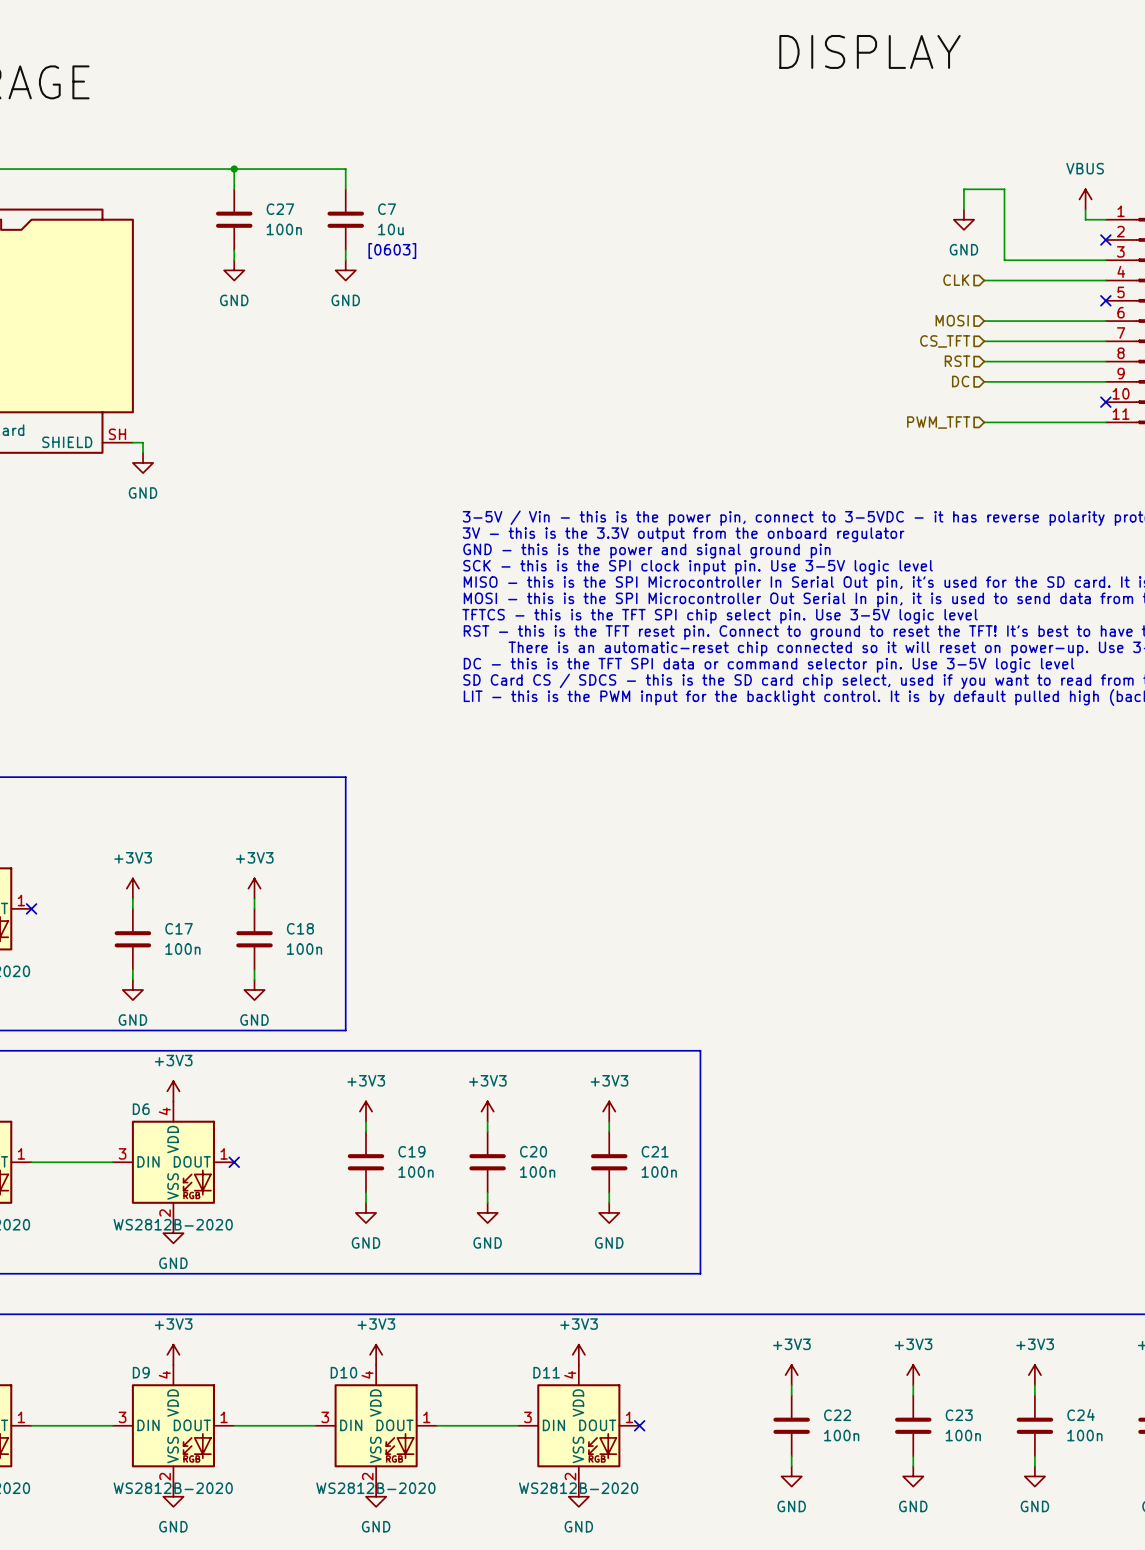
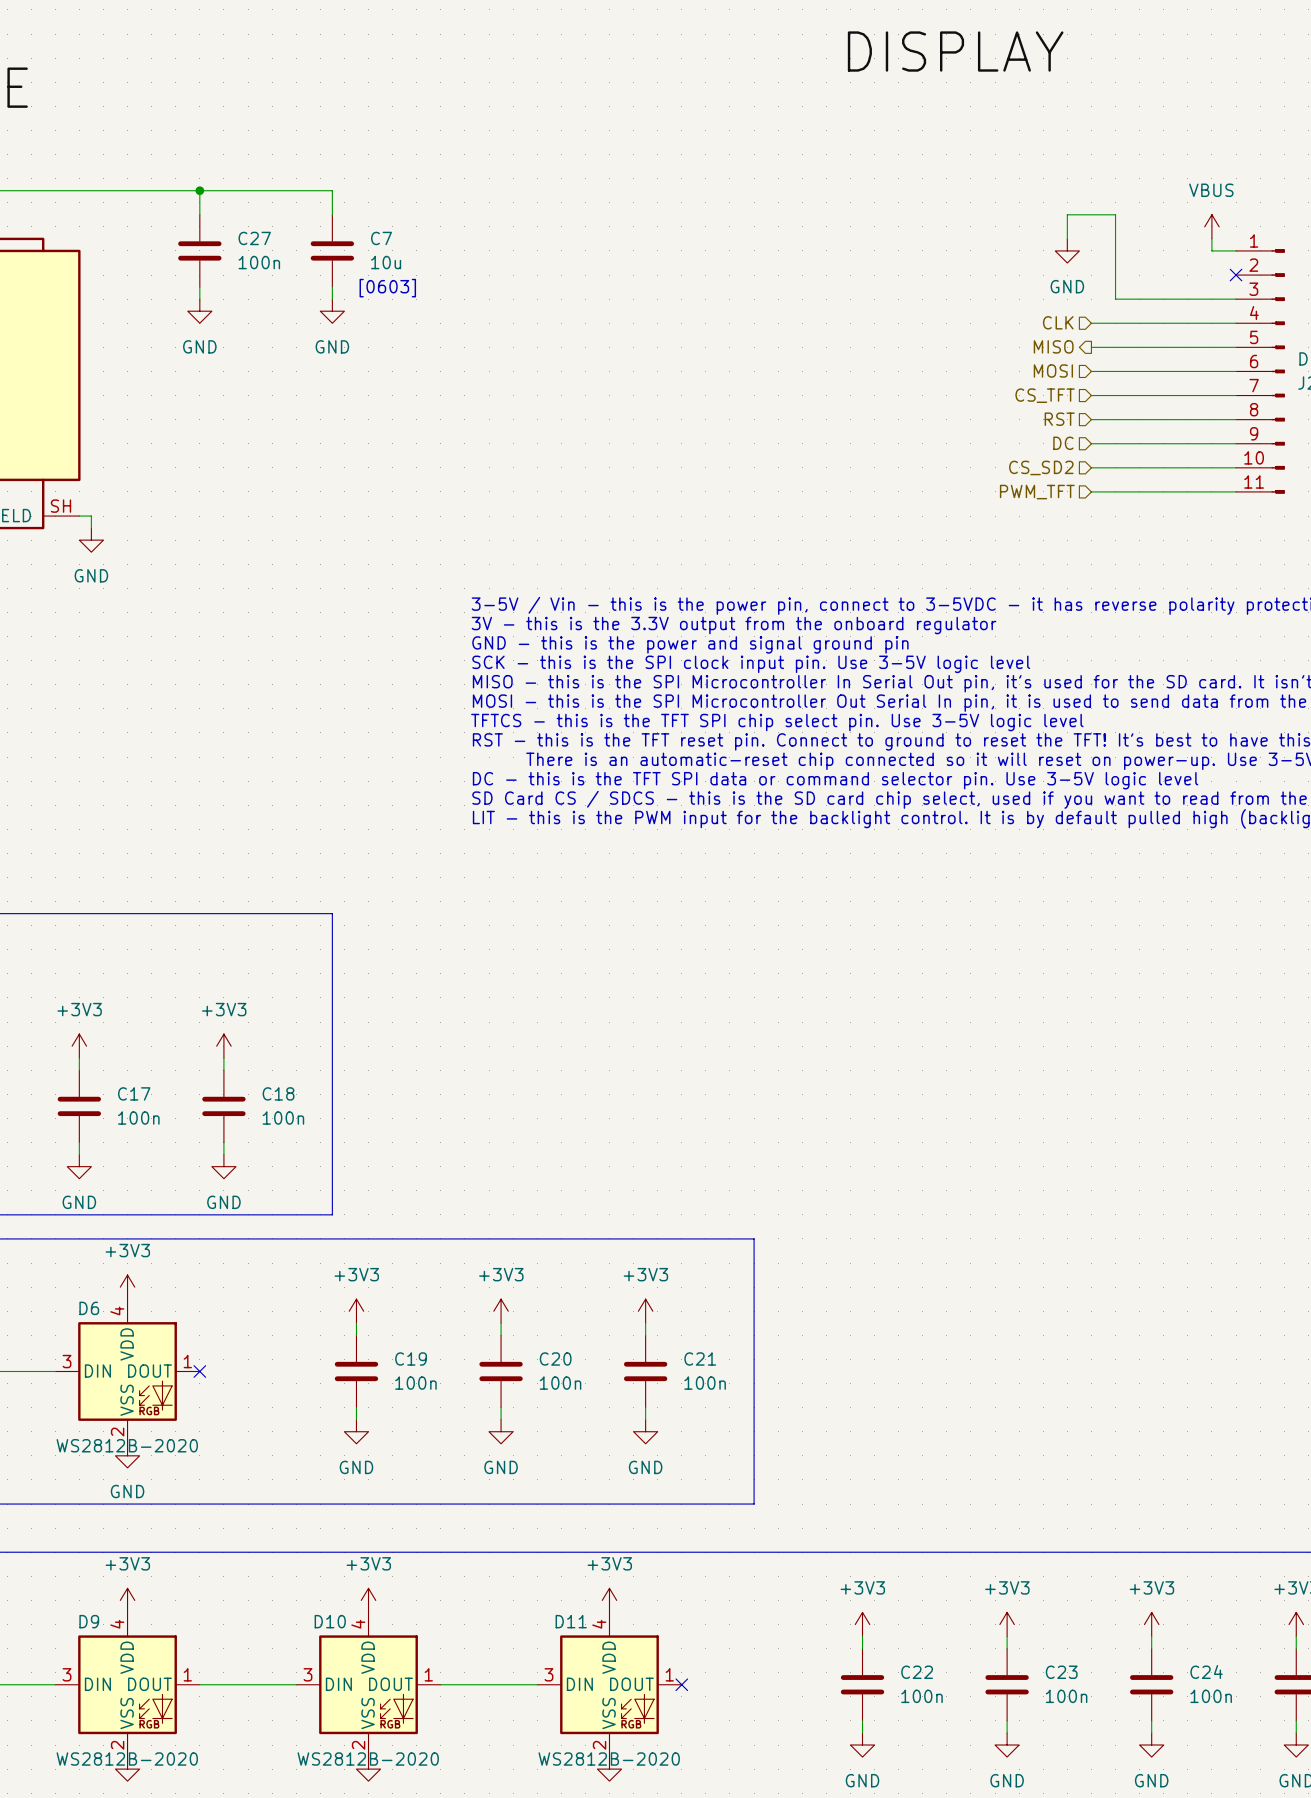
hierarchical label: none -> MISO (1053, 346)
wire: none -> (1091, 347) (1236, 347)
no-connect mark: (1105, 300) -> none
hierarchical label: none -> CS_SD2 (1041, 467)
wire: none -> (1091, 467) (1236, 467)
no-connect mark: (1105, 402) -> none

